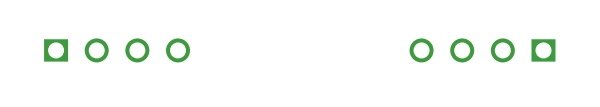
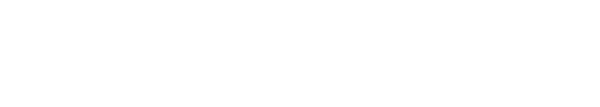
part: (117, 50) -> none
part: (482, 50) -> none

